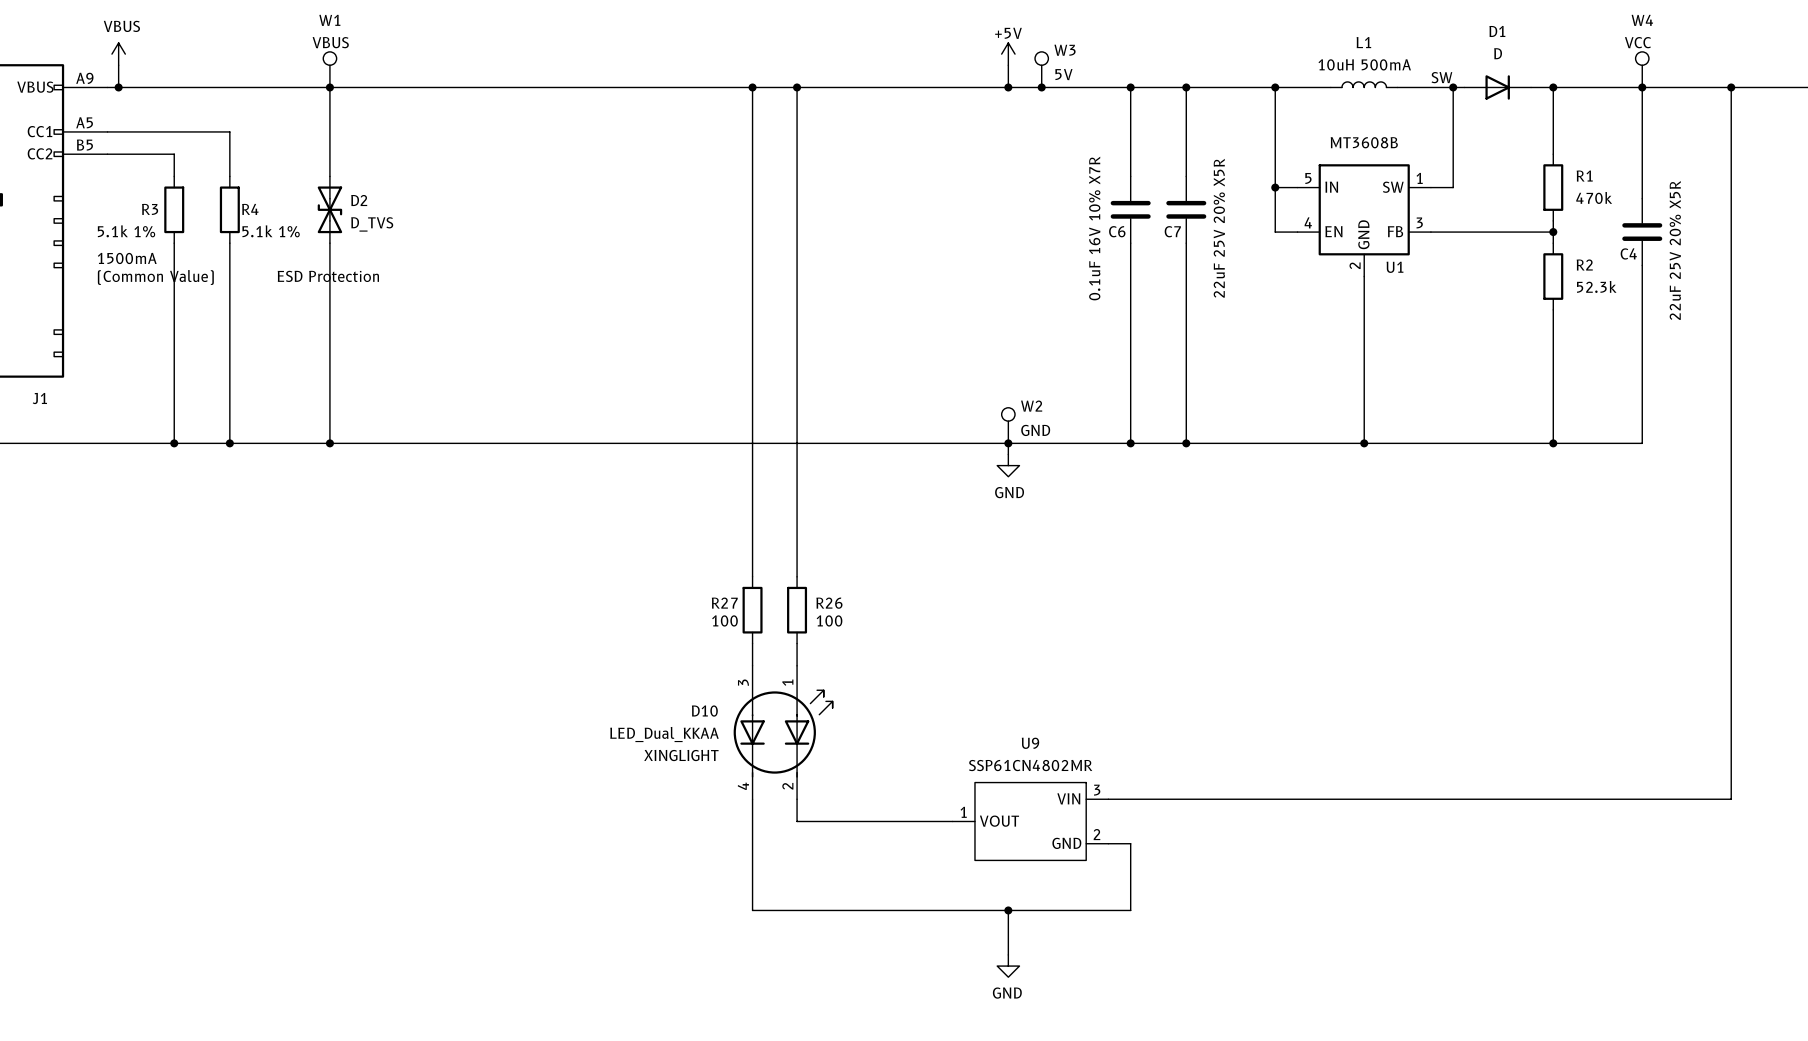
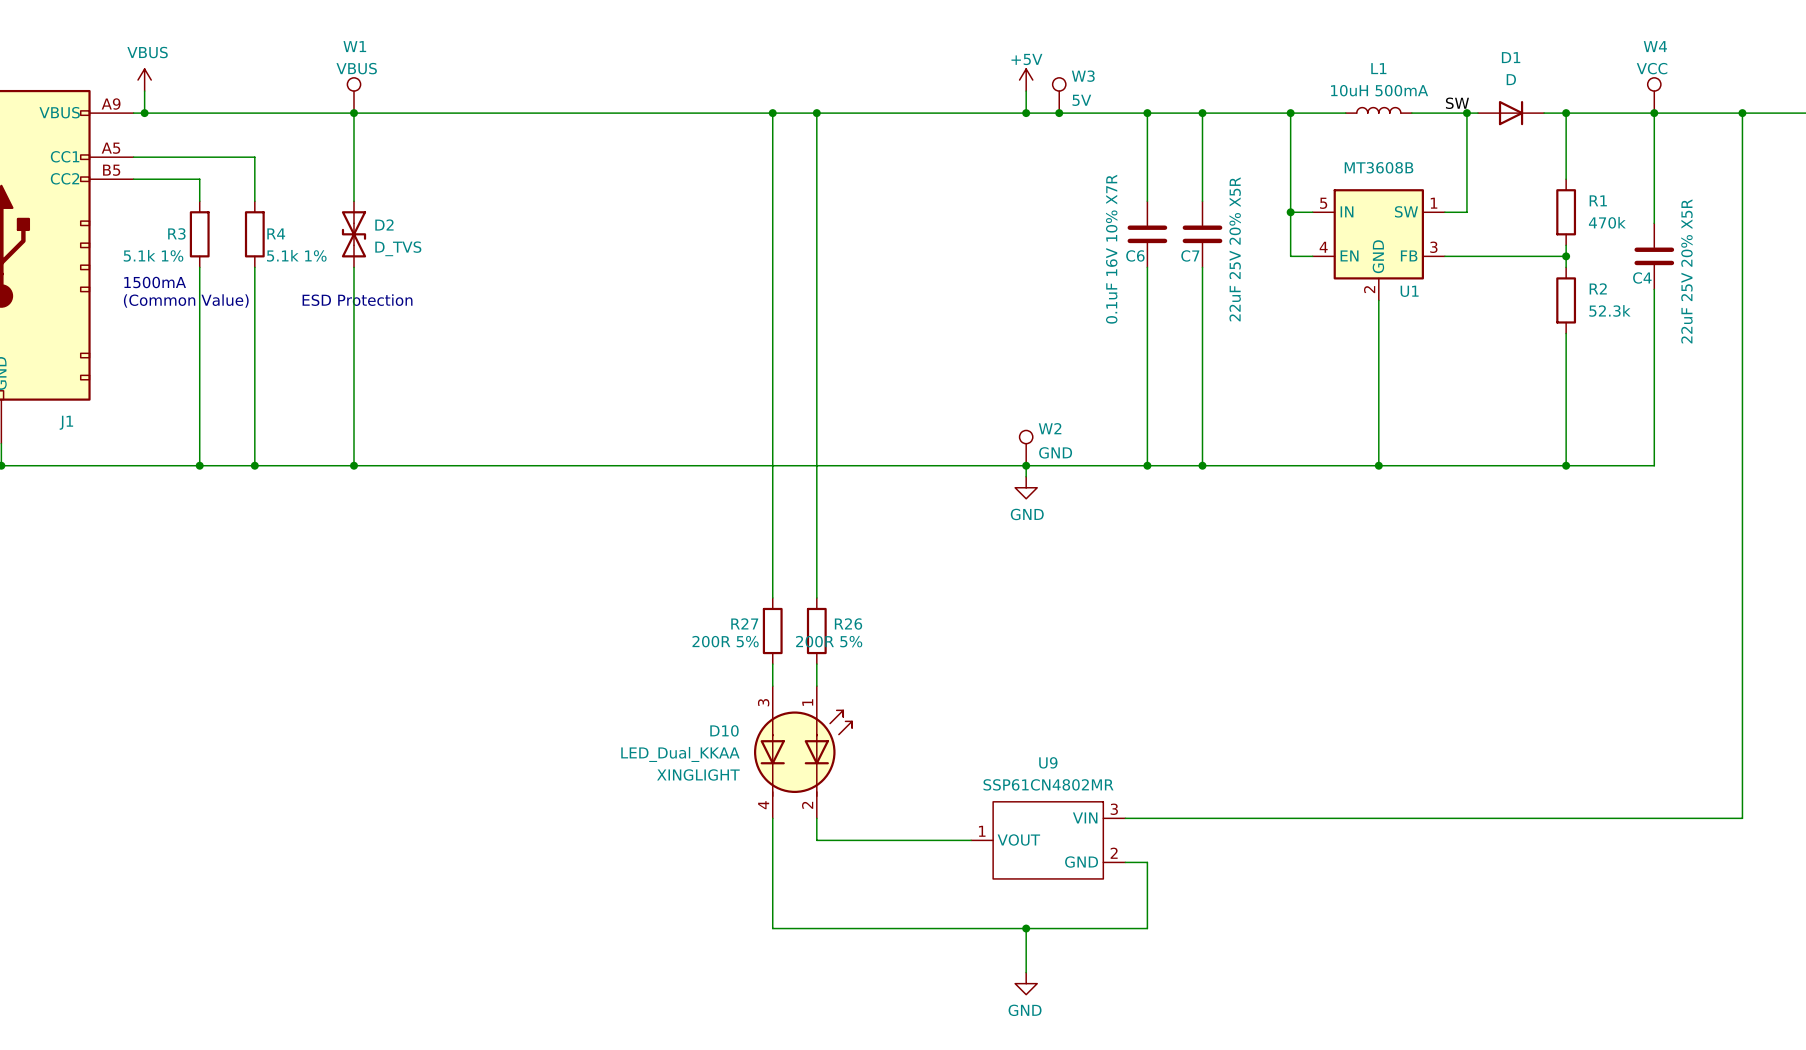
R27 value: 100 (724, 620) -> 200R 5% (725, 641)
R26 value: 100 (829, 620) -> 200R 5% (829, 641)

